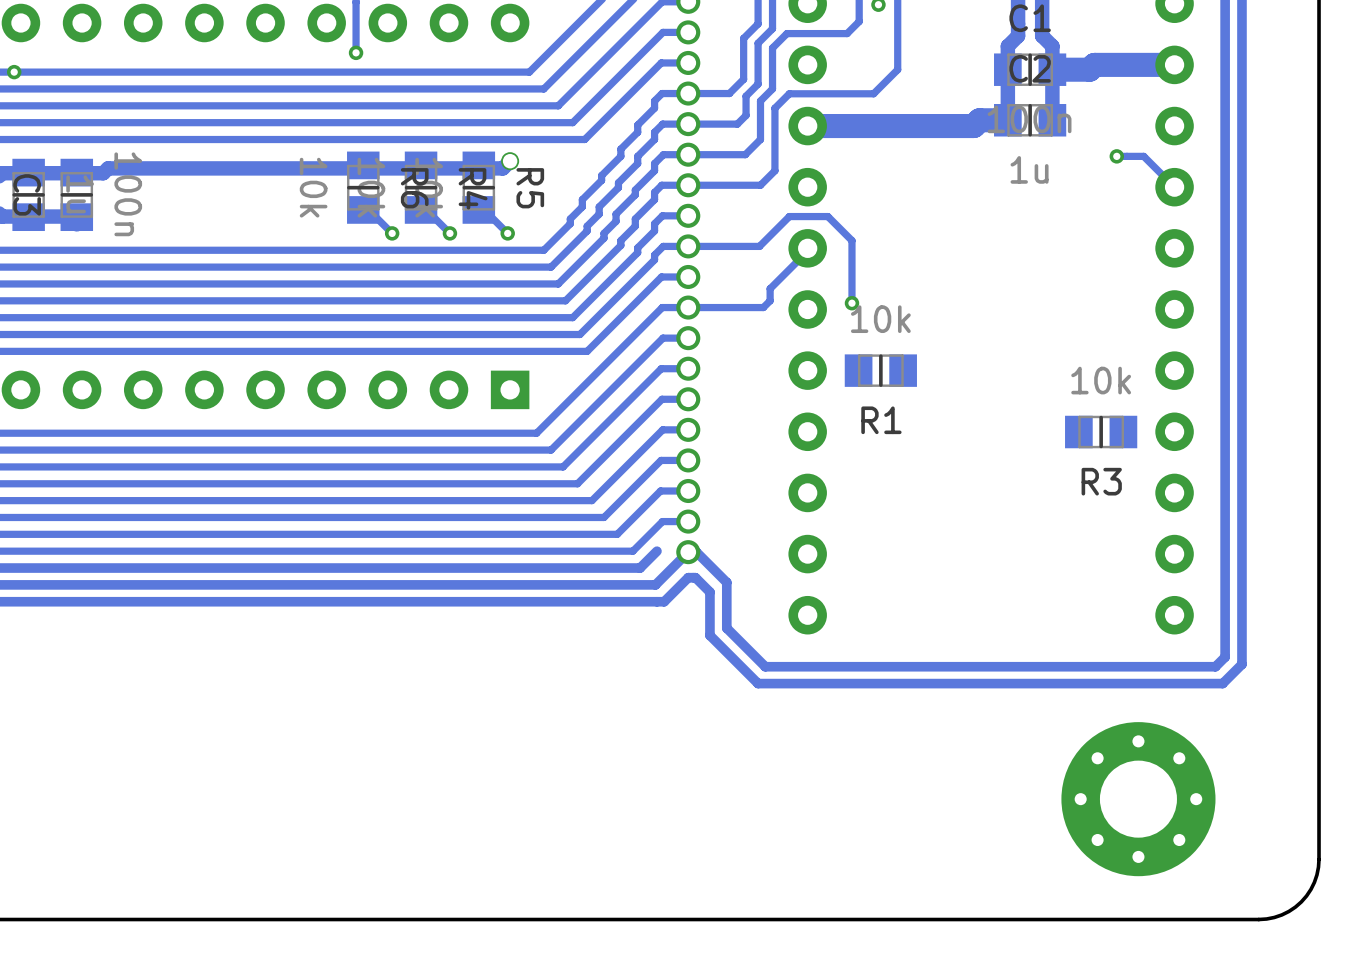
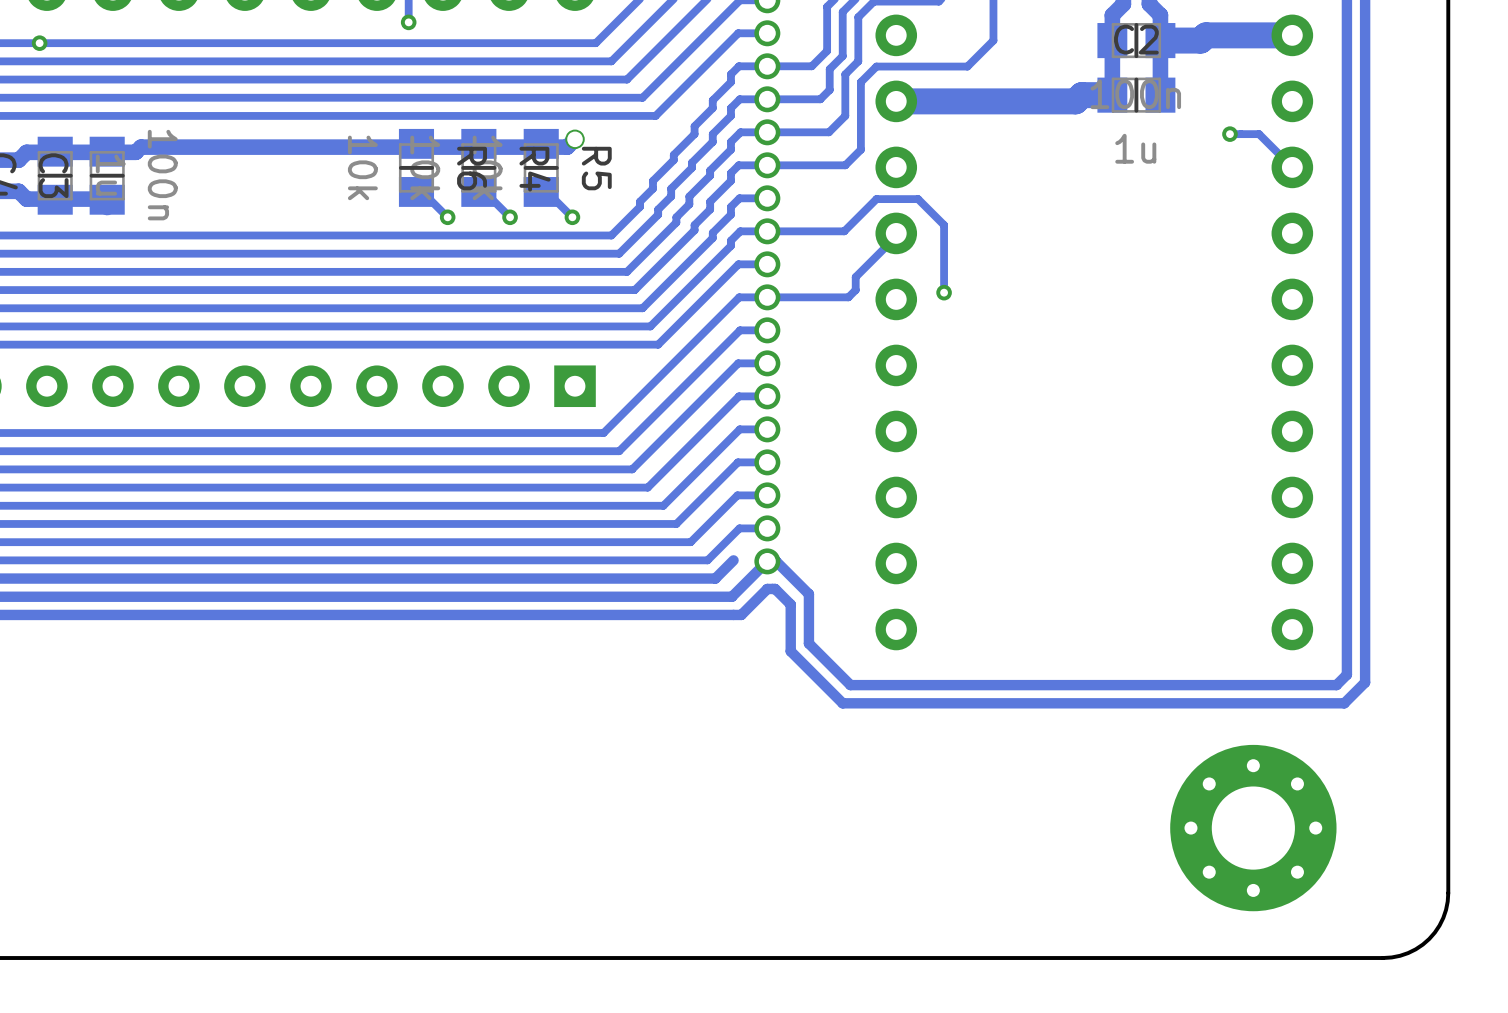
R1: 10k (880, 370) -> none
R3: 10k (1101, 432) -> none

